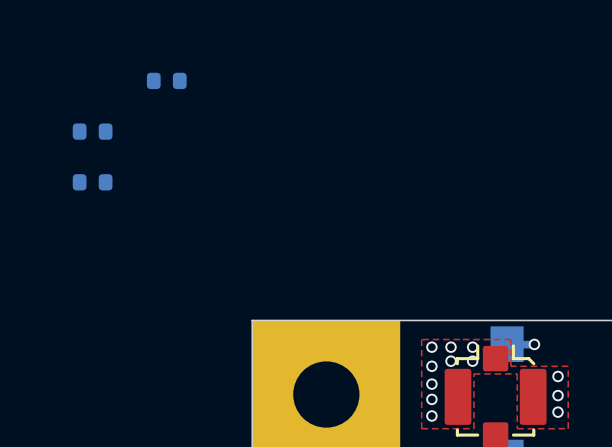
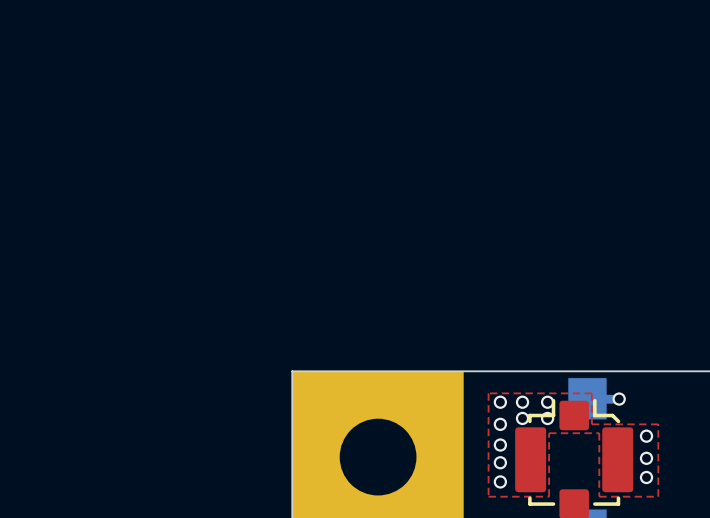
part: (166, 80) -> none
part: (92, 131) -> none
part: (92, 182) -> none

